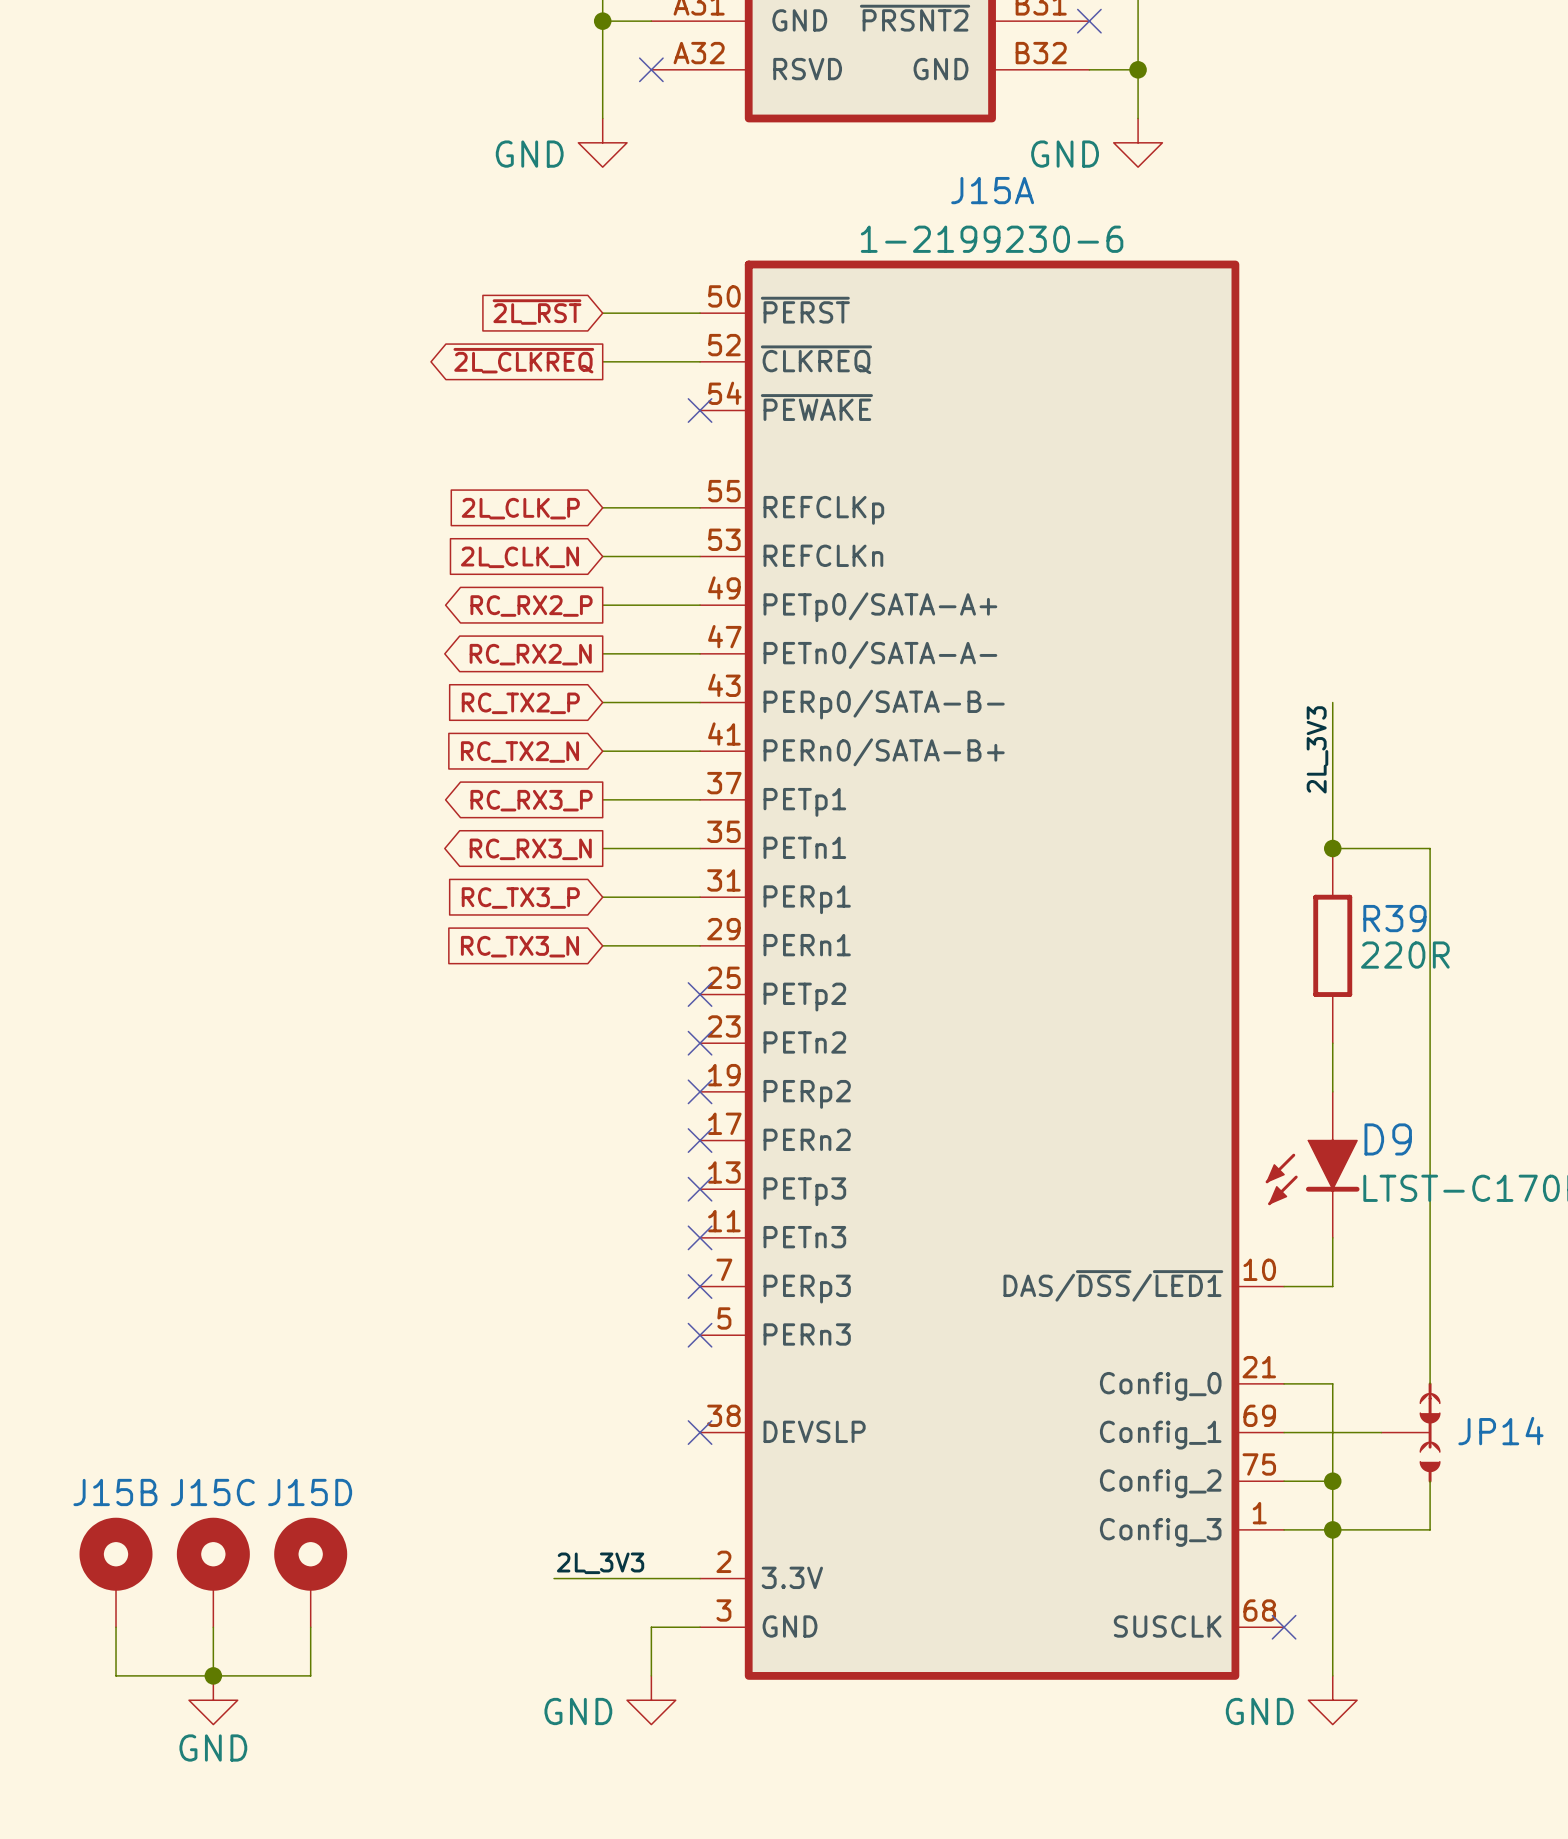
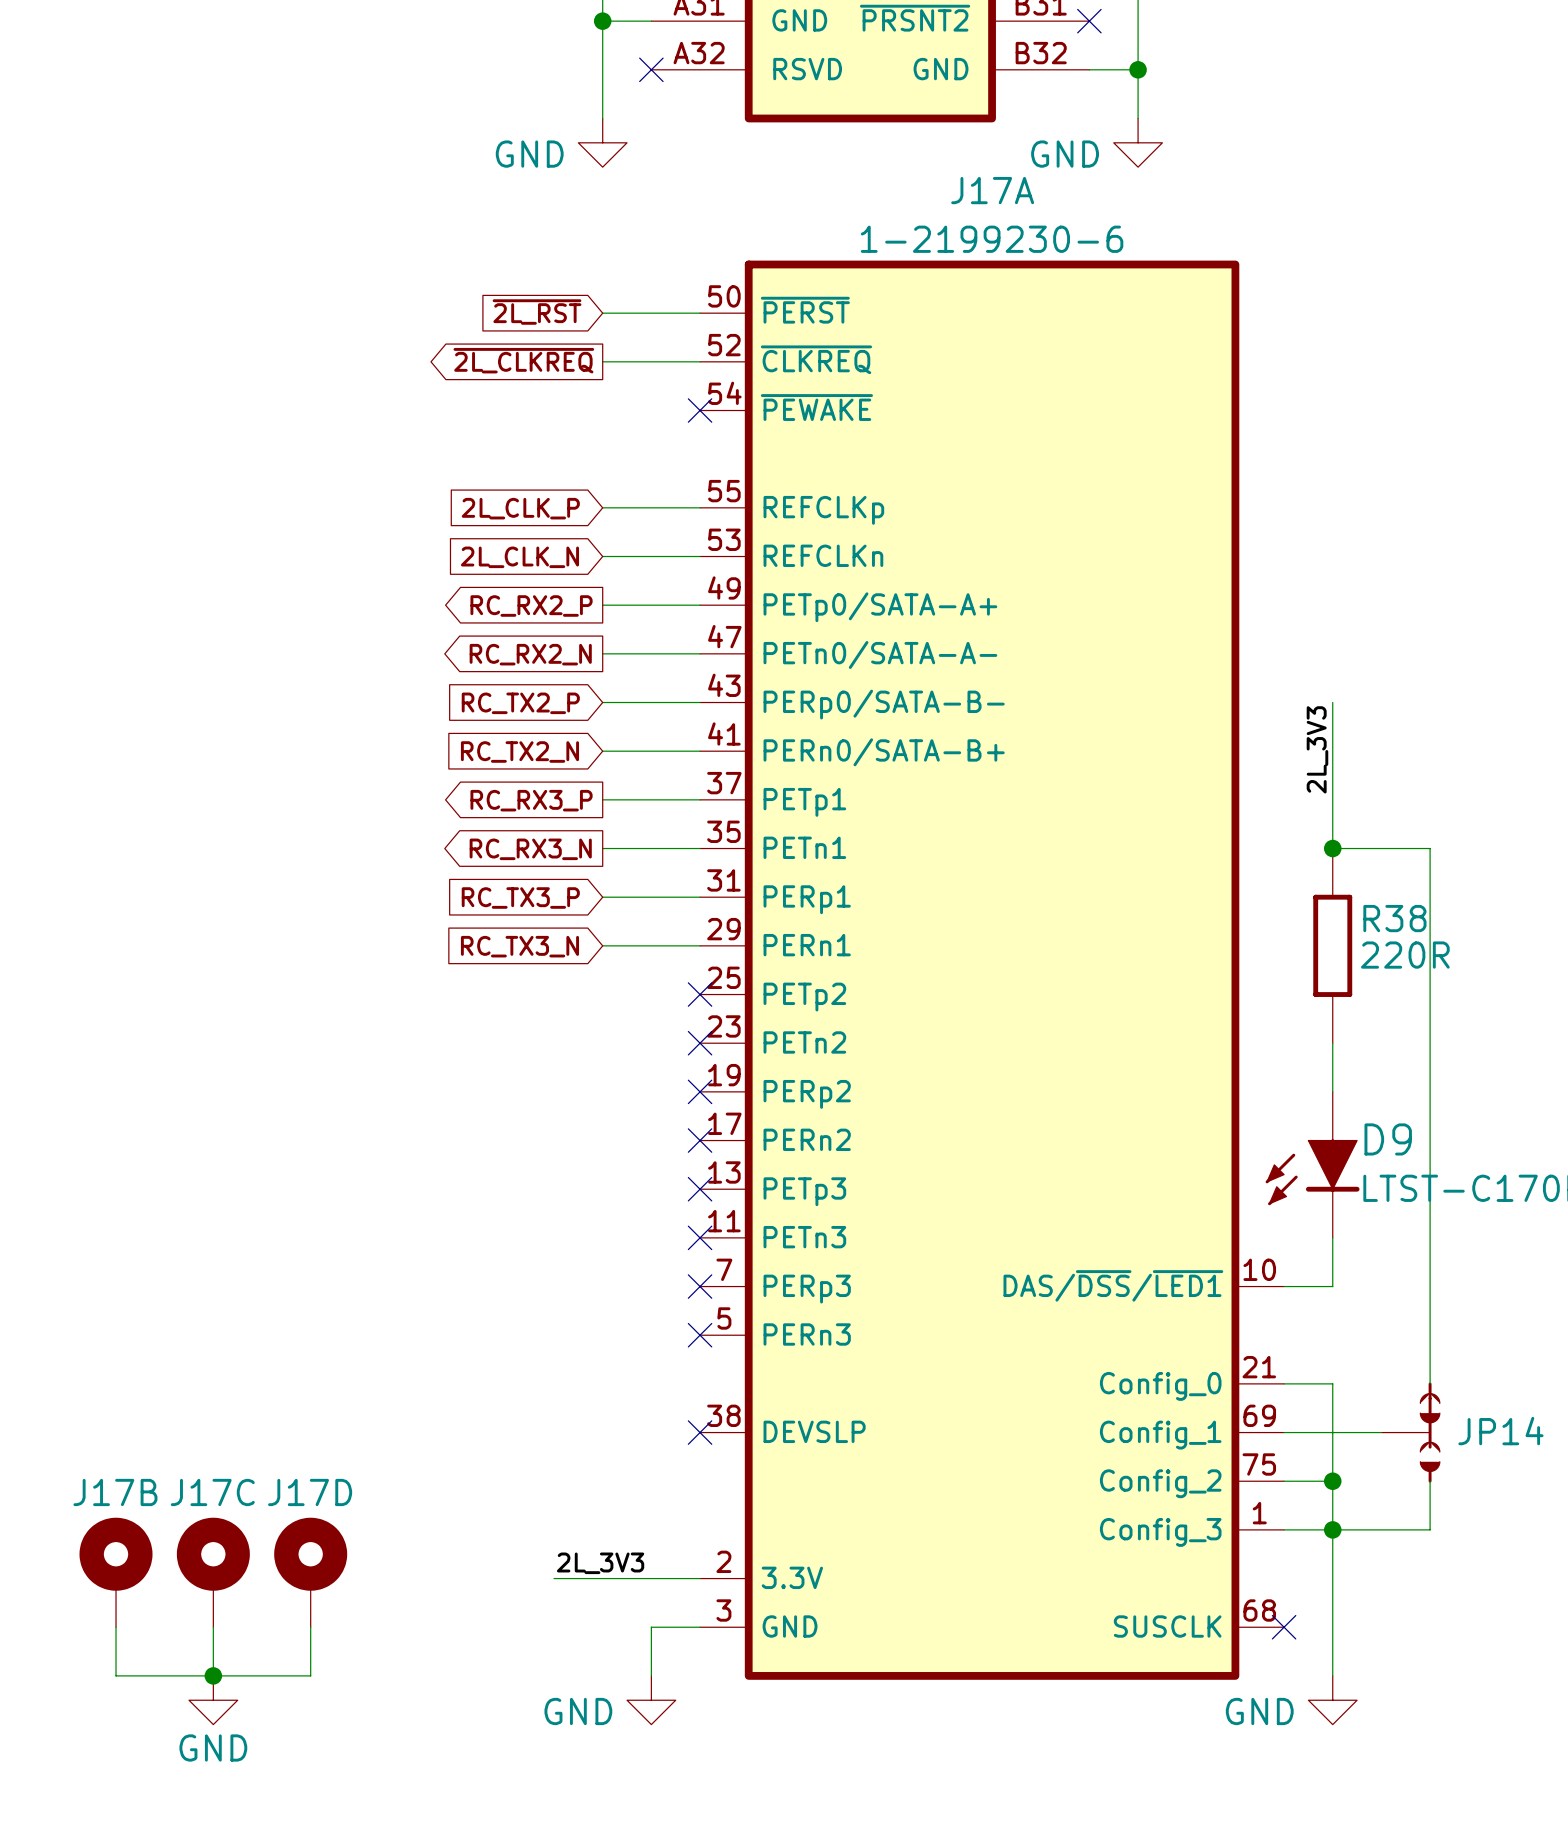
J15A name: J15A (992, 190) -> J17A (992, 190)
R39 name: R39 (1394, 918) -> R38 (1394, 918)
J15B name: J15B (115, 1492) -> J17B (115, 1492)
J15C name: J15C (212, 1492) -> J17C (212, 1492)
J15D name: J15D (310, 1492) -> J17D (310, 1492)

